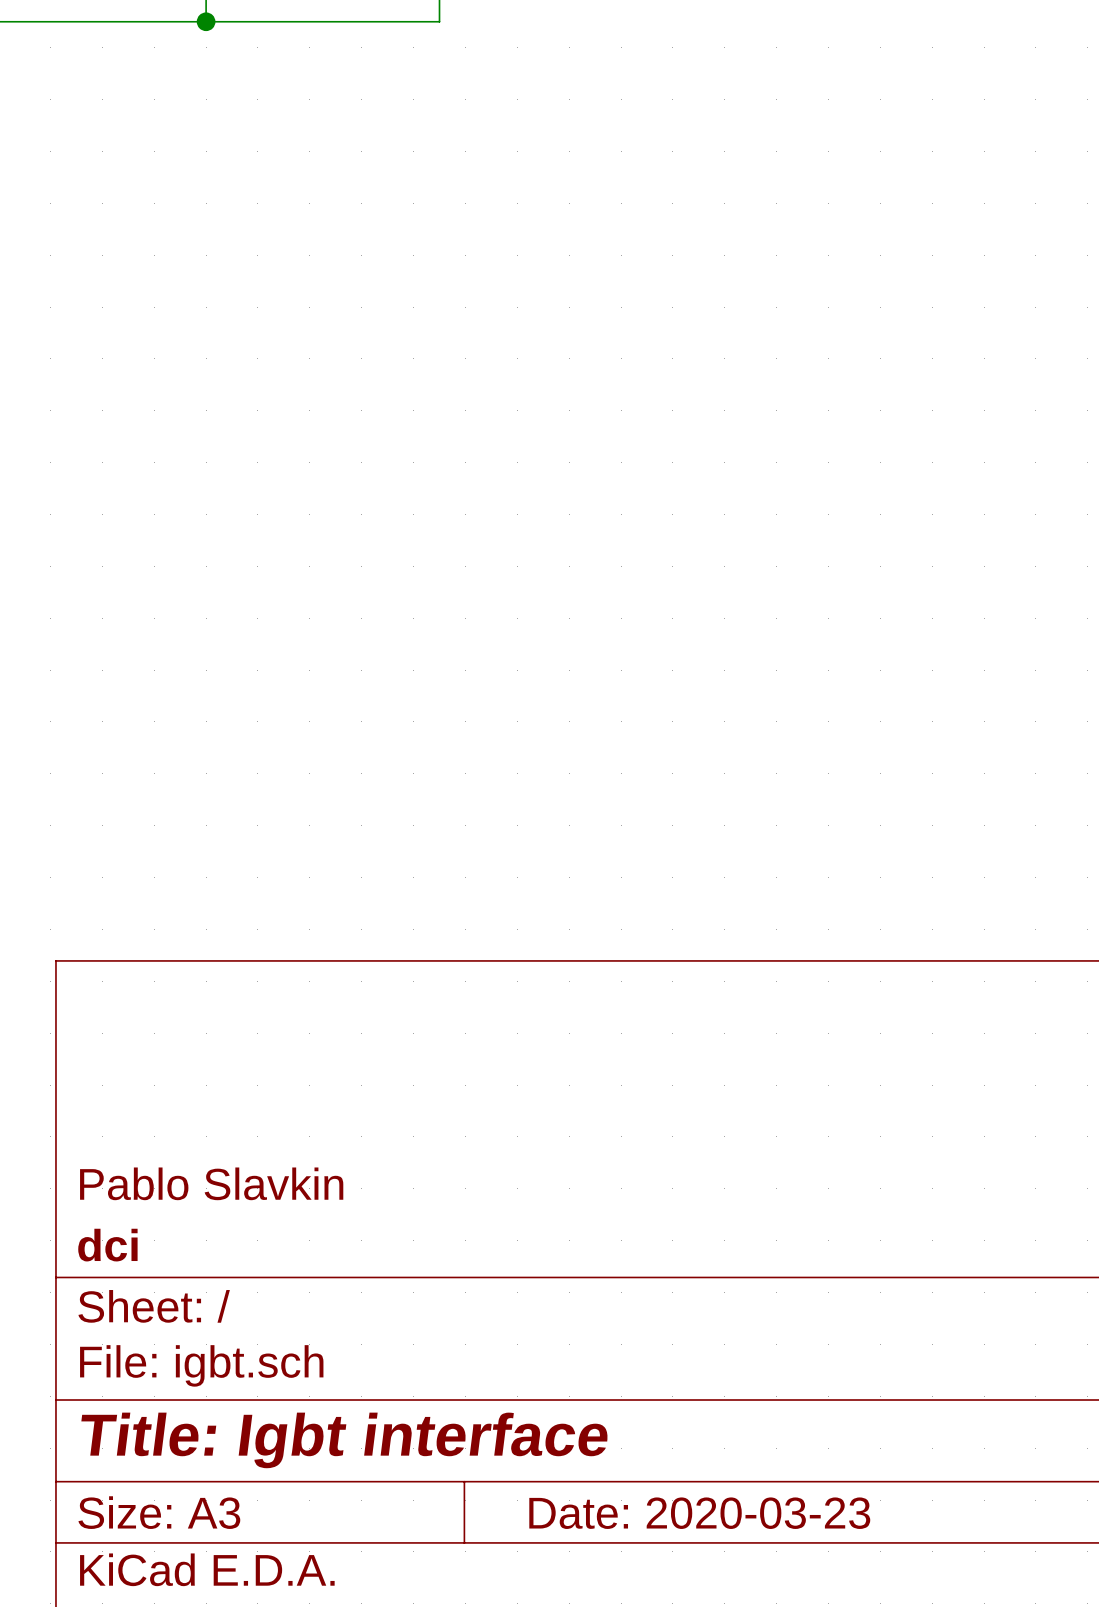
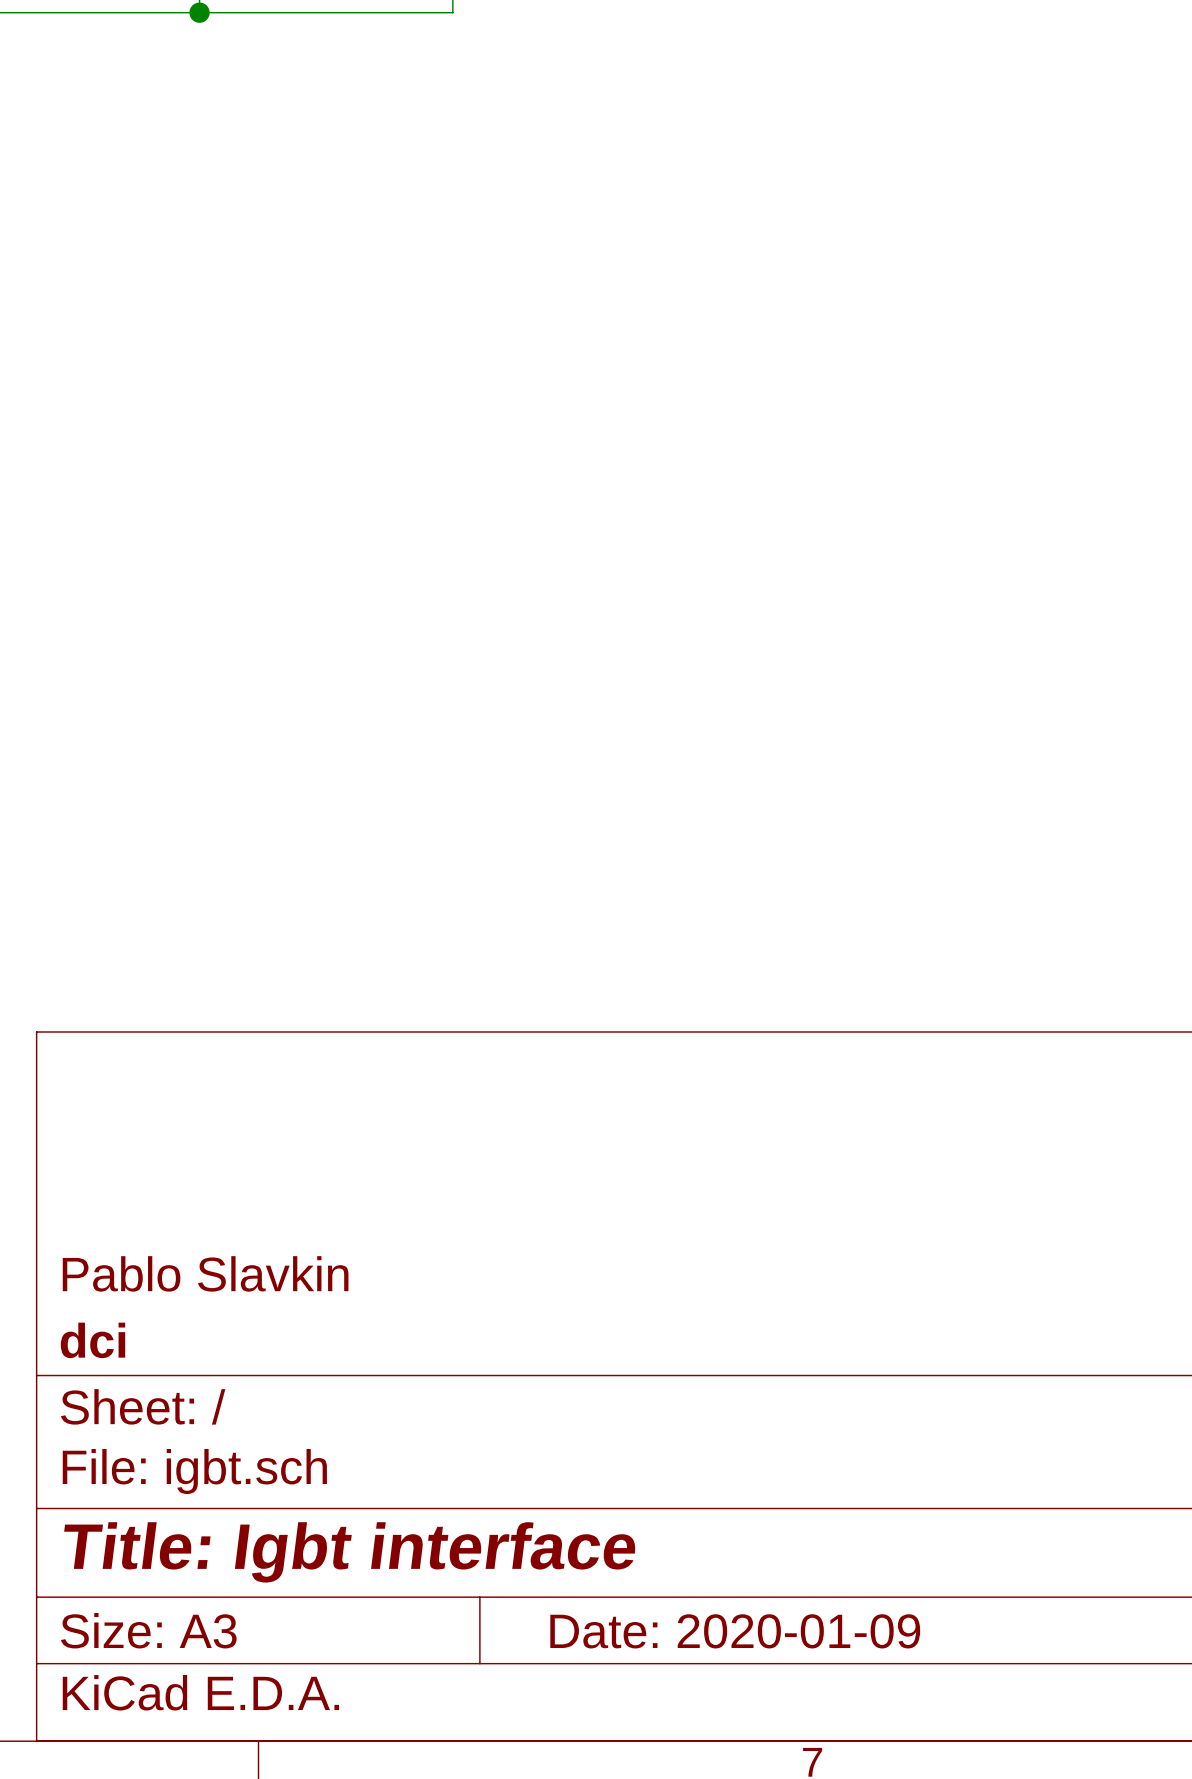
title block: Date: 2020-03-23 (699, 1513) -> Date: 2020-01-09 (735, 1631)

